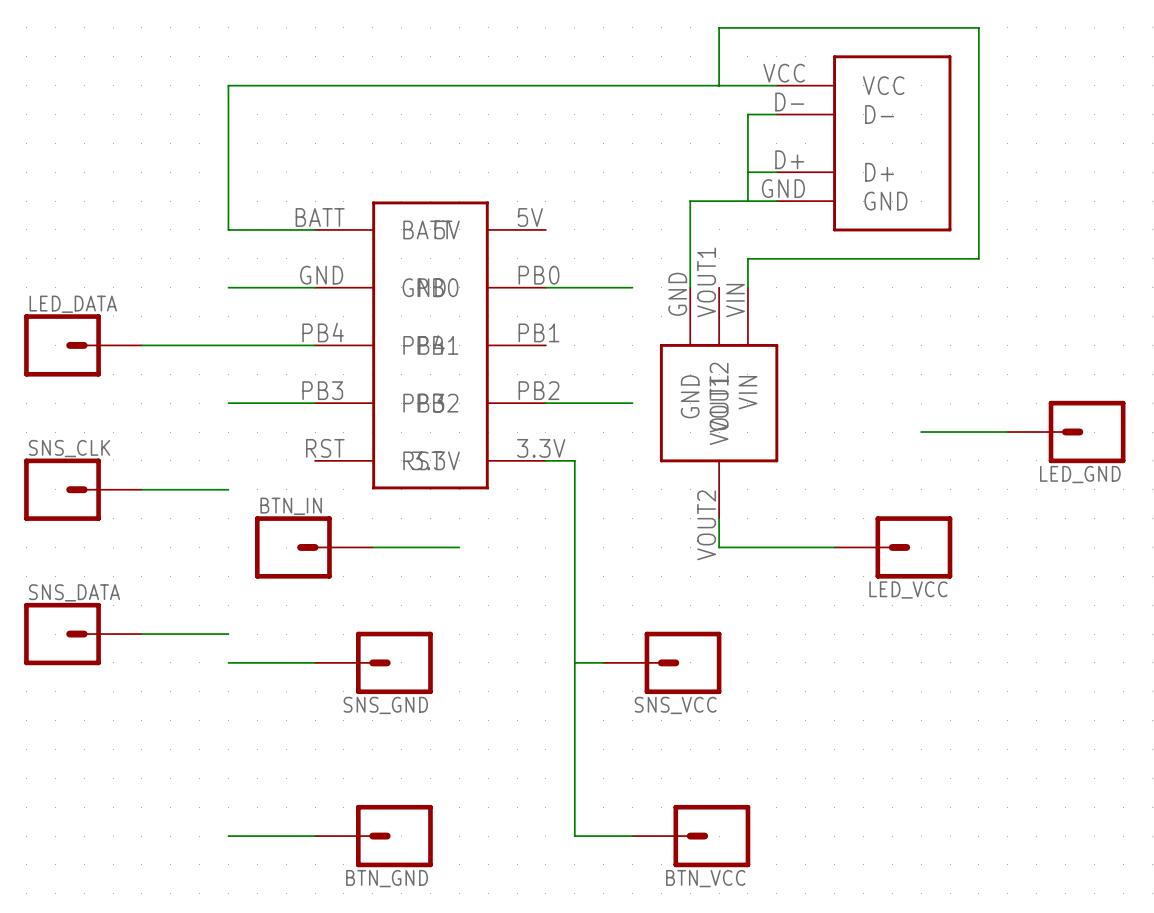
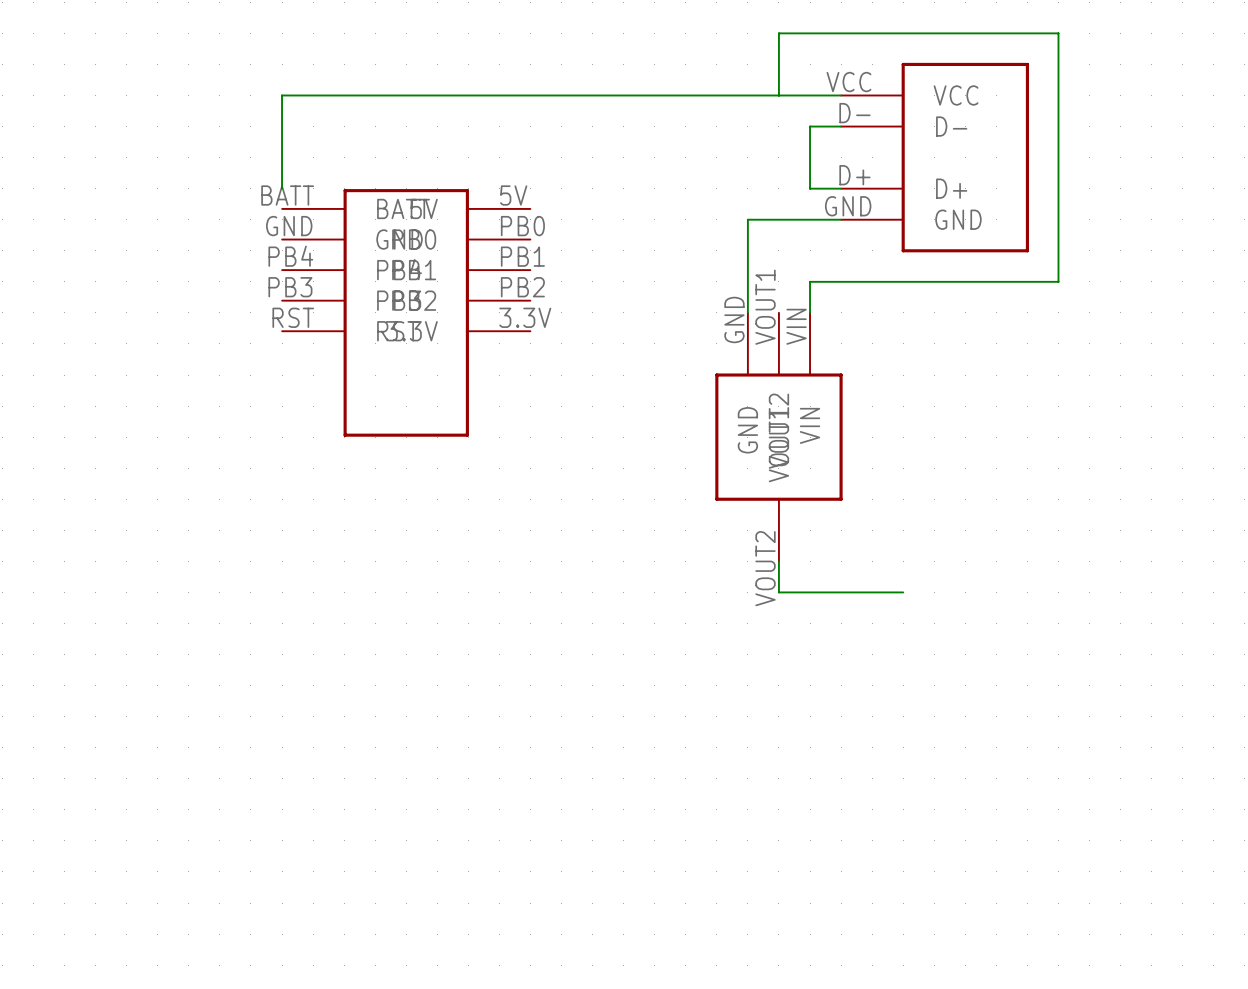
wire: (257, 85) (228, 85) (228, 229) (315, 229) -> (282, 95) (282, 188)
wire: (747, 172) (747, 201) -> none
wire: (228, 287) (315, 287) -> none
part: none -> (406, 312)
wire: (545, 287) (632, 287) -> none
LED_DATA: (82, 345) -> none
wire: (141, 345) (315, 345) -> none
part: (430, 345) -> none
wire: (228, 403) (315, 403) -> none
wire: (545, 403) (632, 403) -> none
wire: (921, 432) (1007, 432) -> none
LED_GND: (1066, 432) -> none
wire: (545, 460) (574, 460) (574, 836) (632, 836) -> none
SNS_CLK: (82, 489) -> none
wire: (141, 489) (228, 489) -> none
BTN_IN: (313, 547) -> none
wire: (372, 547) (459, 547) -> none
LED_VCC: (893, 547) -> none
SNS_DATA: (82, 634) -> none
wire: (141, 634) (228, 634) -> none
wire: (228, 662) (315, 662) -> none
SNS_GND: (373, 662) -> none
wire: (574, 662) (603, 662) -> none
SNS_VCC: (662, 662) -> none
wire: (228, 836) (315, 836) -> none
BTN_GND: (373, 836) -> none
BTN_VCC: (691, 836) -> none

